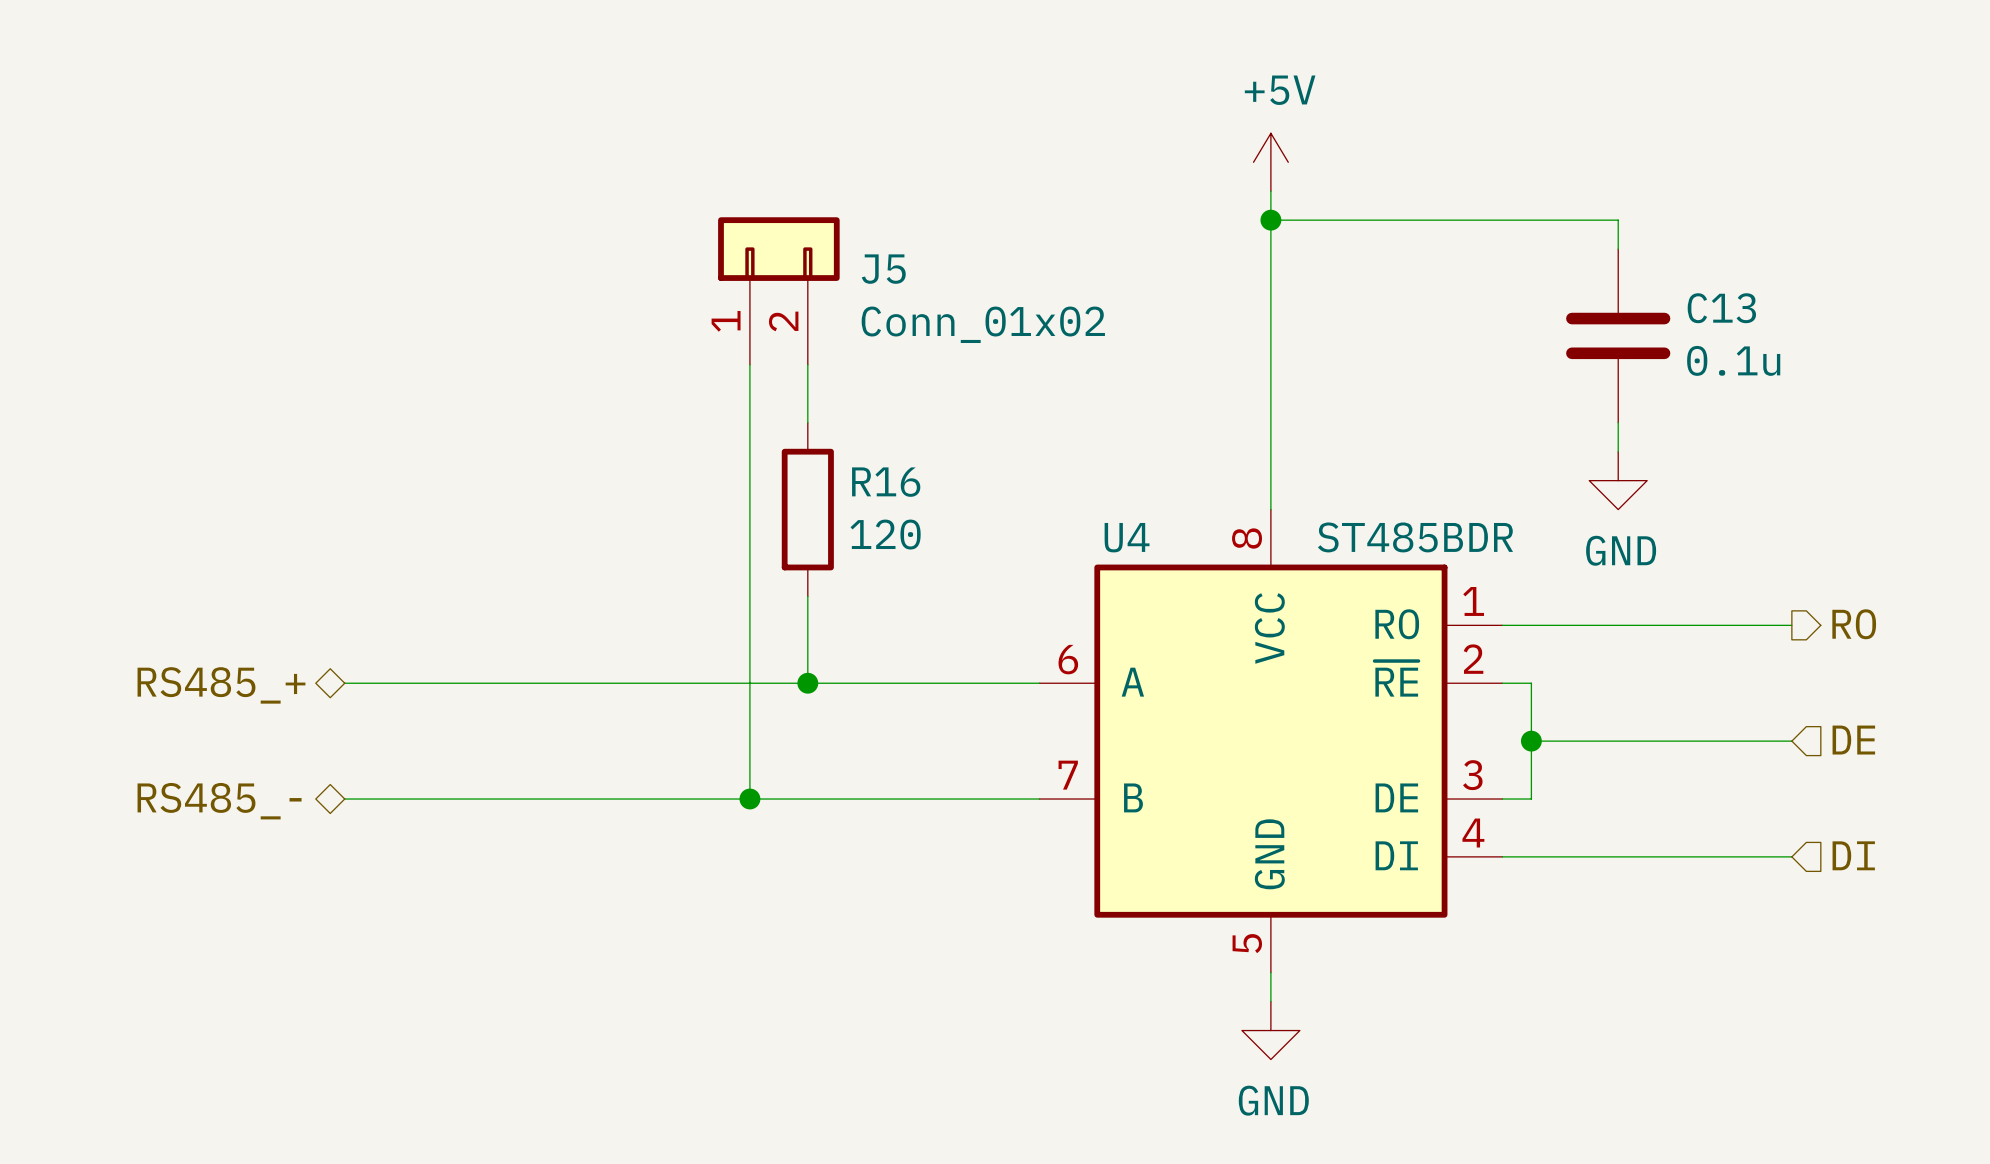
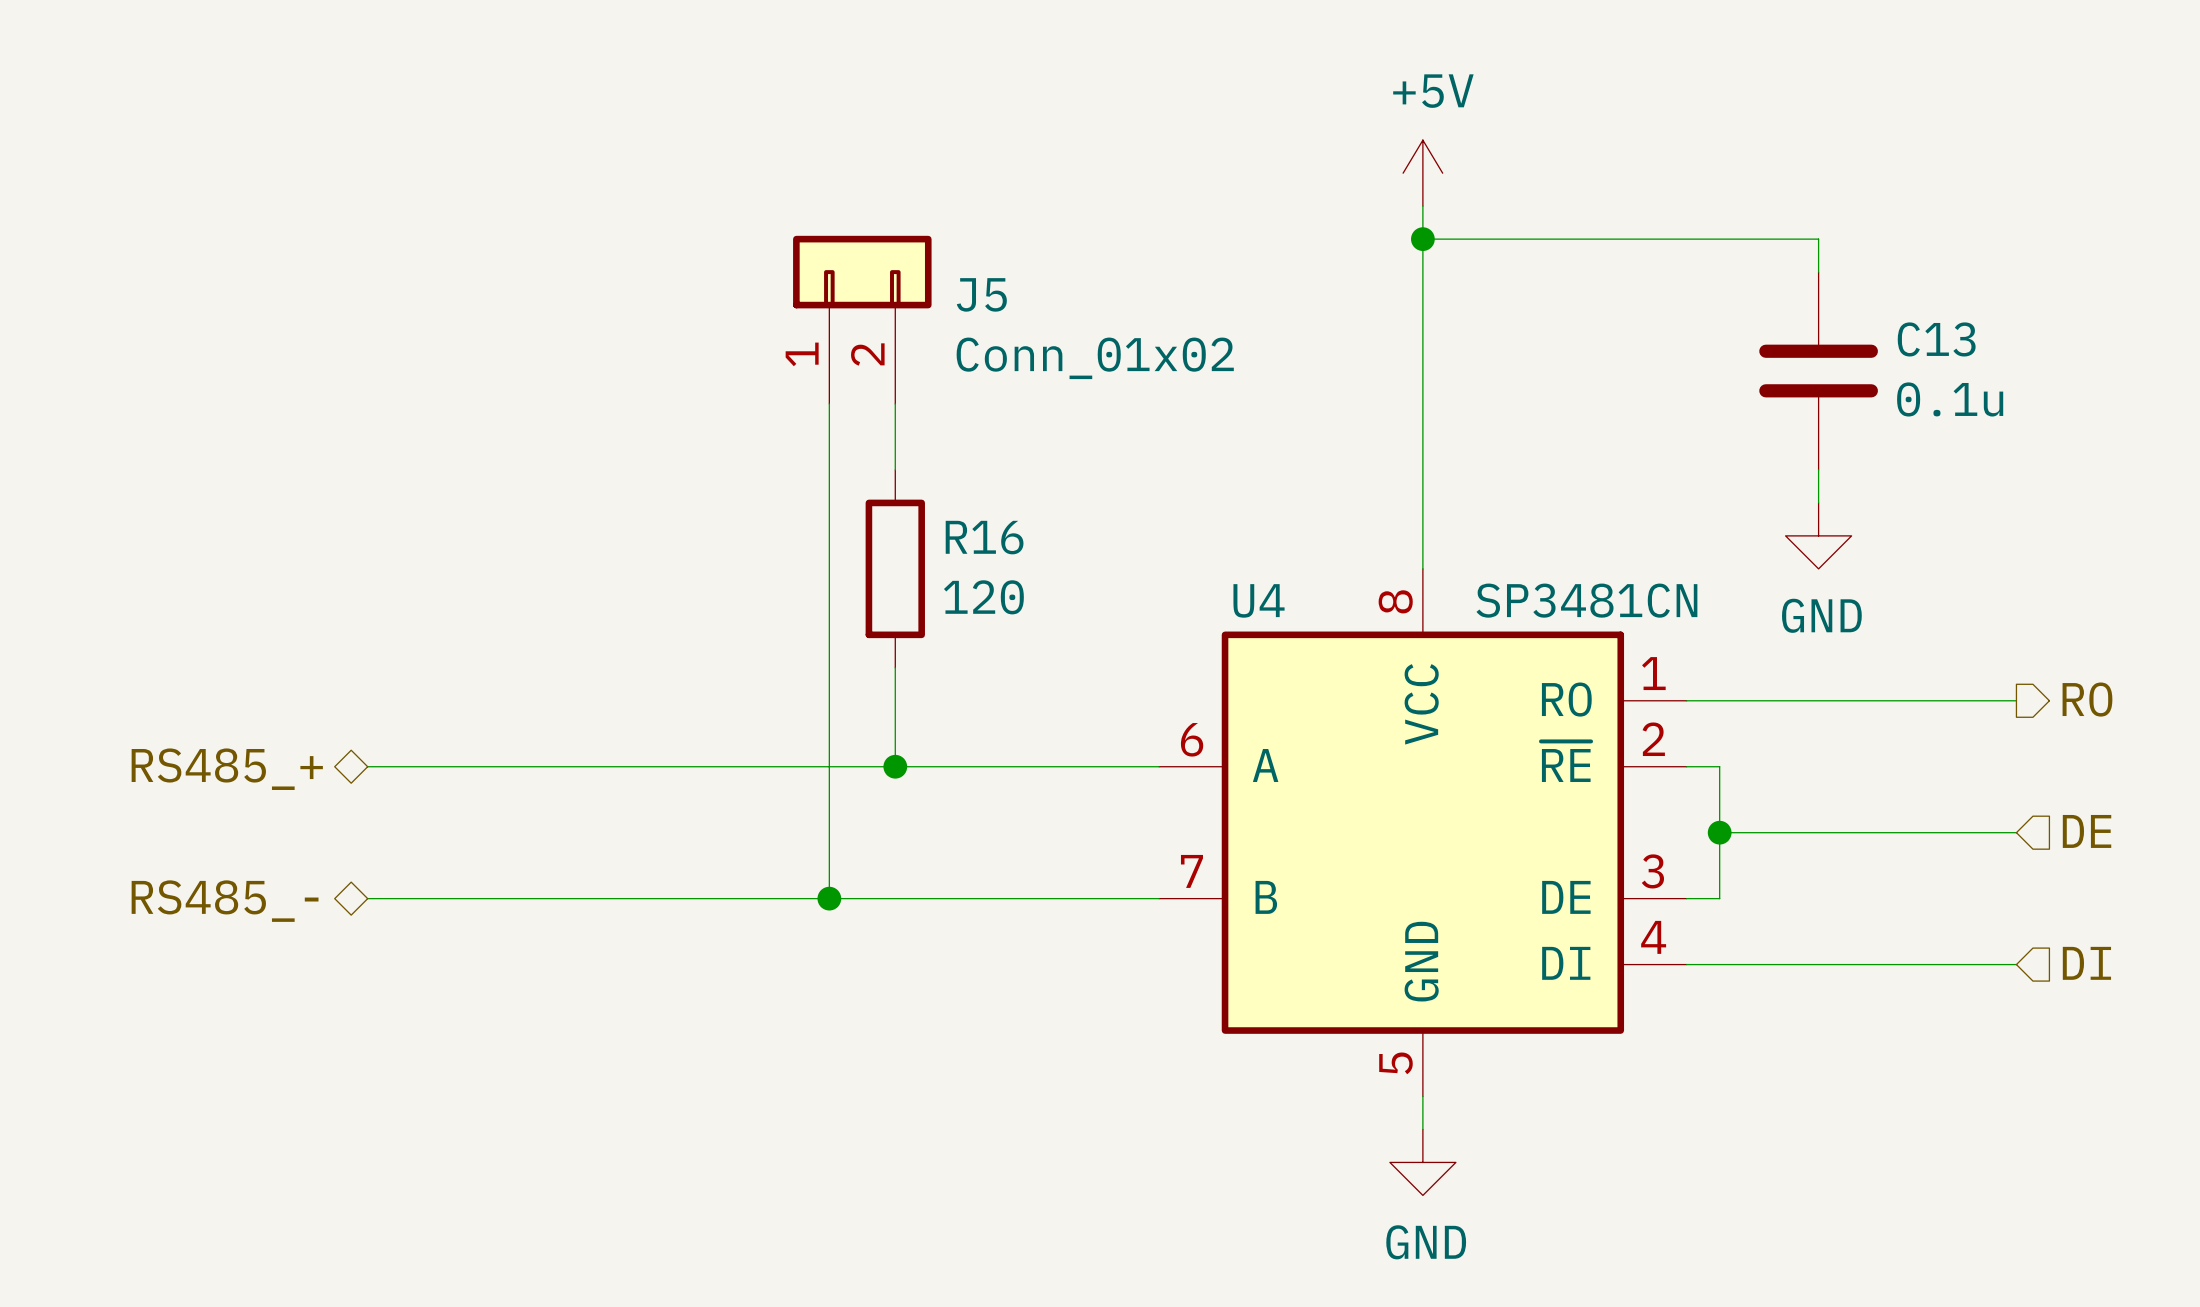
U4 value: ST485BDR (1415, 537) -> SP3481CN (1586, 600)

